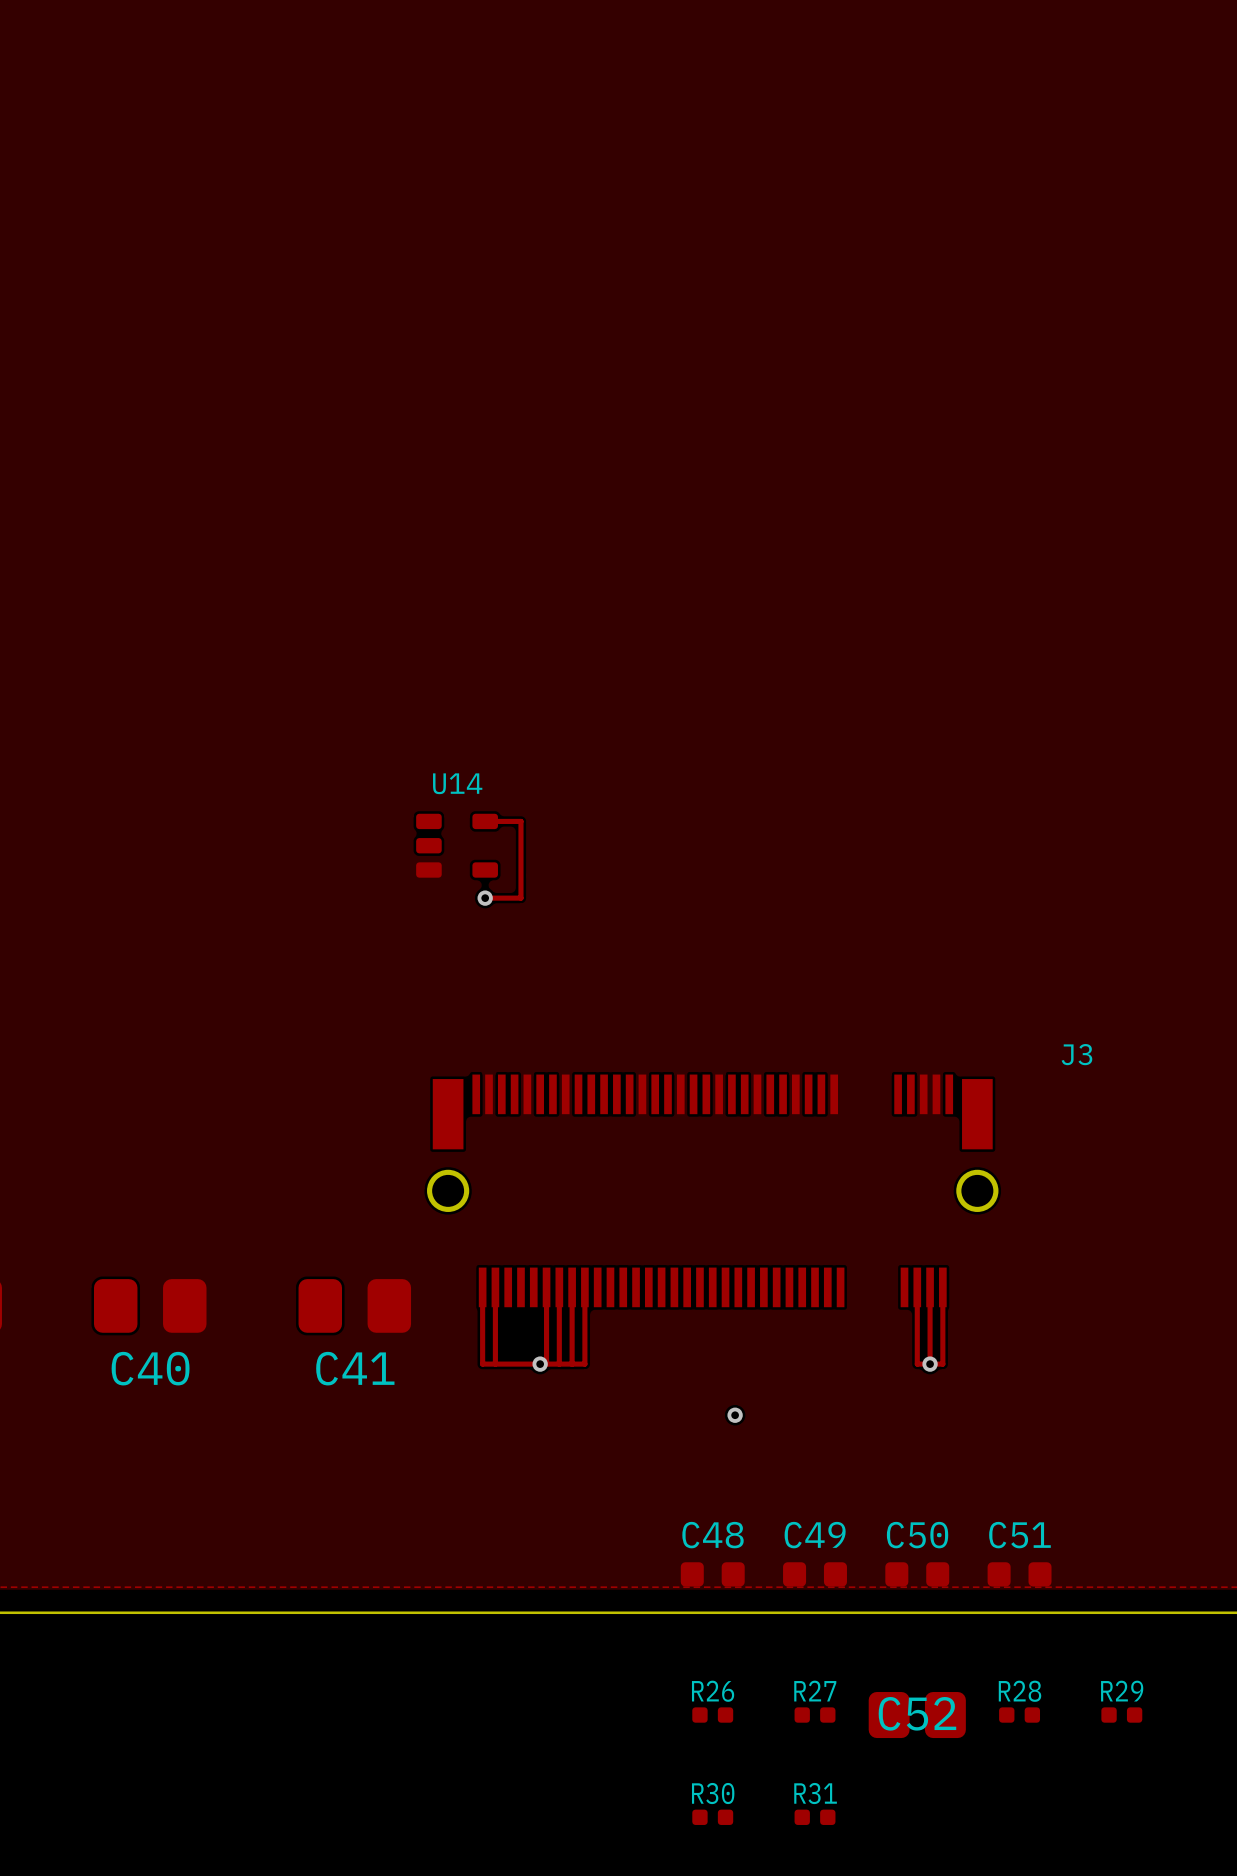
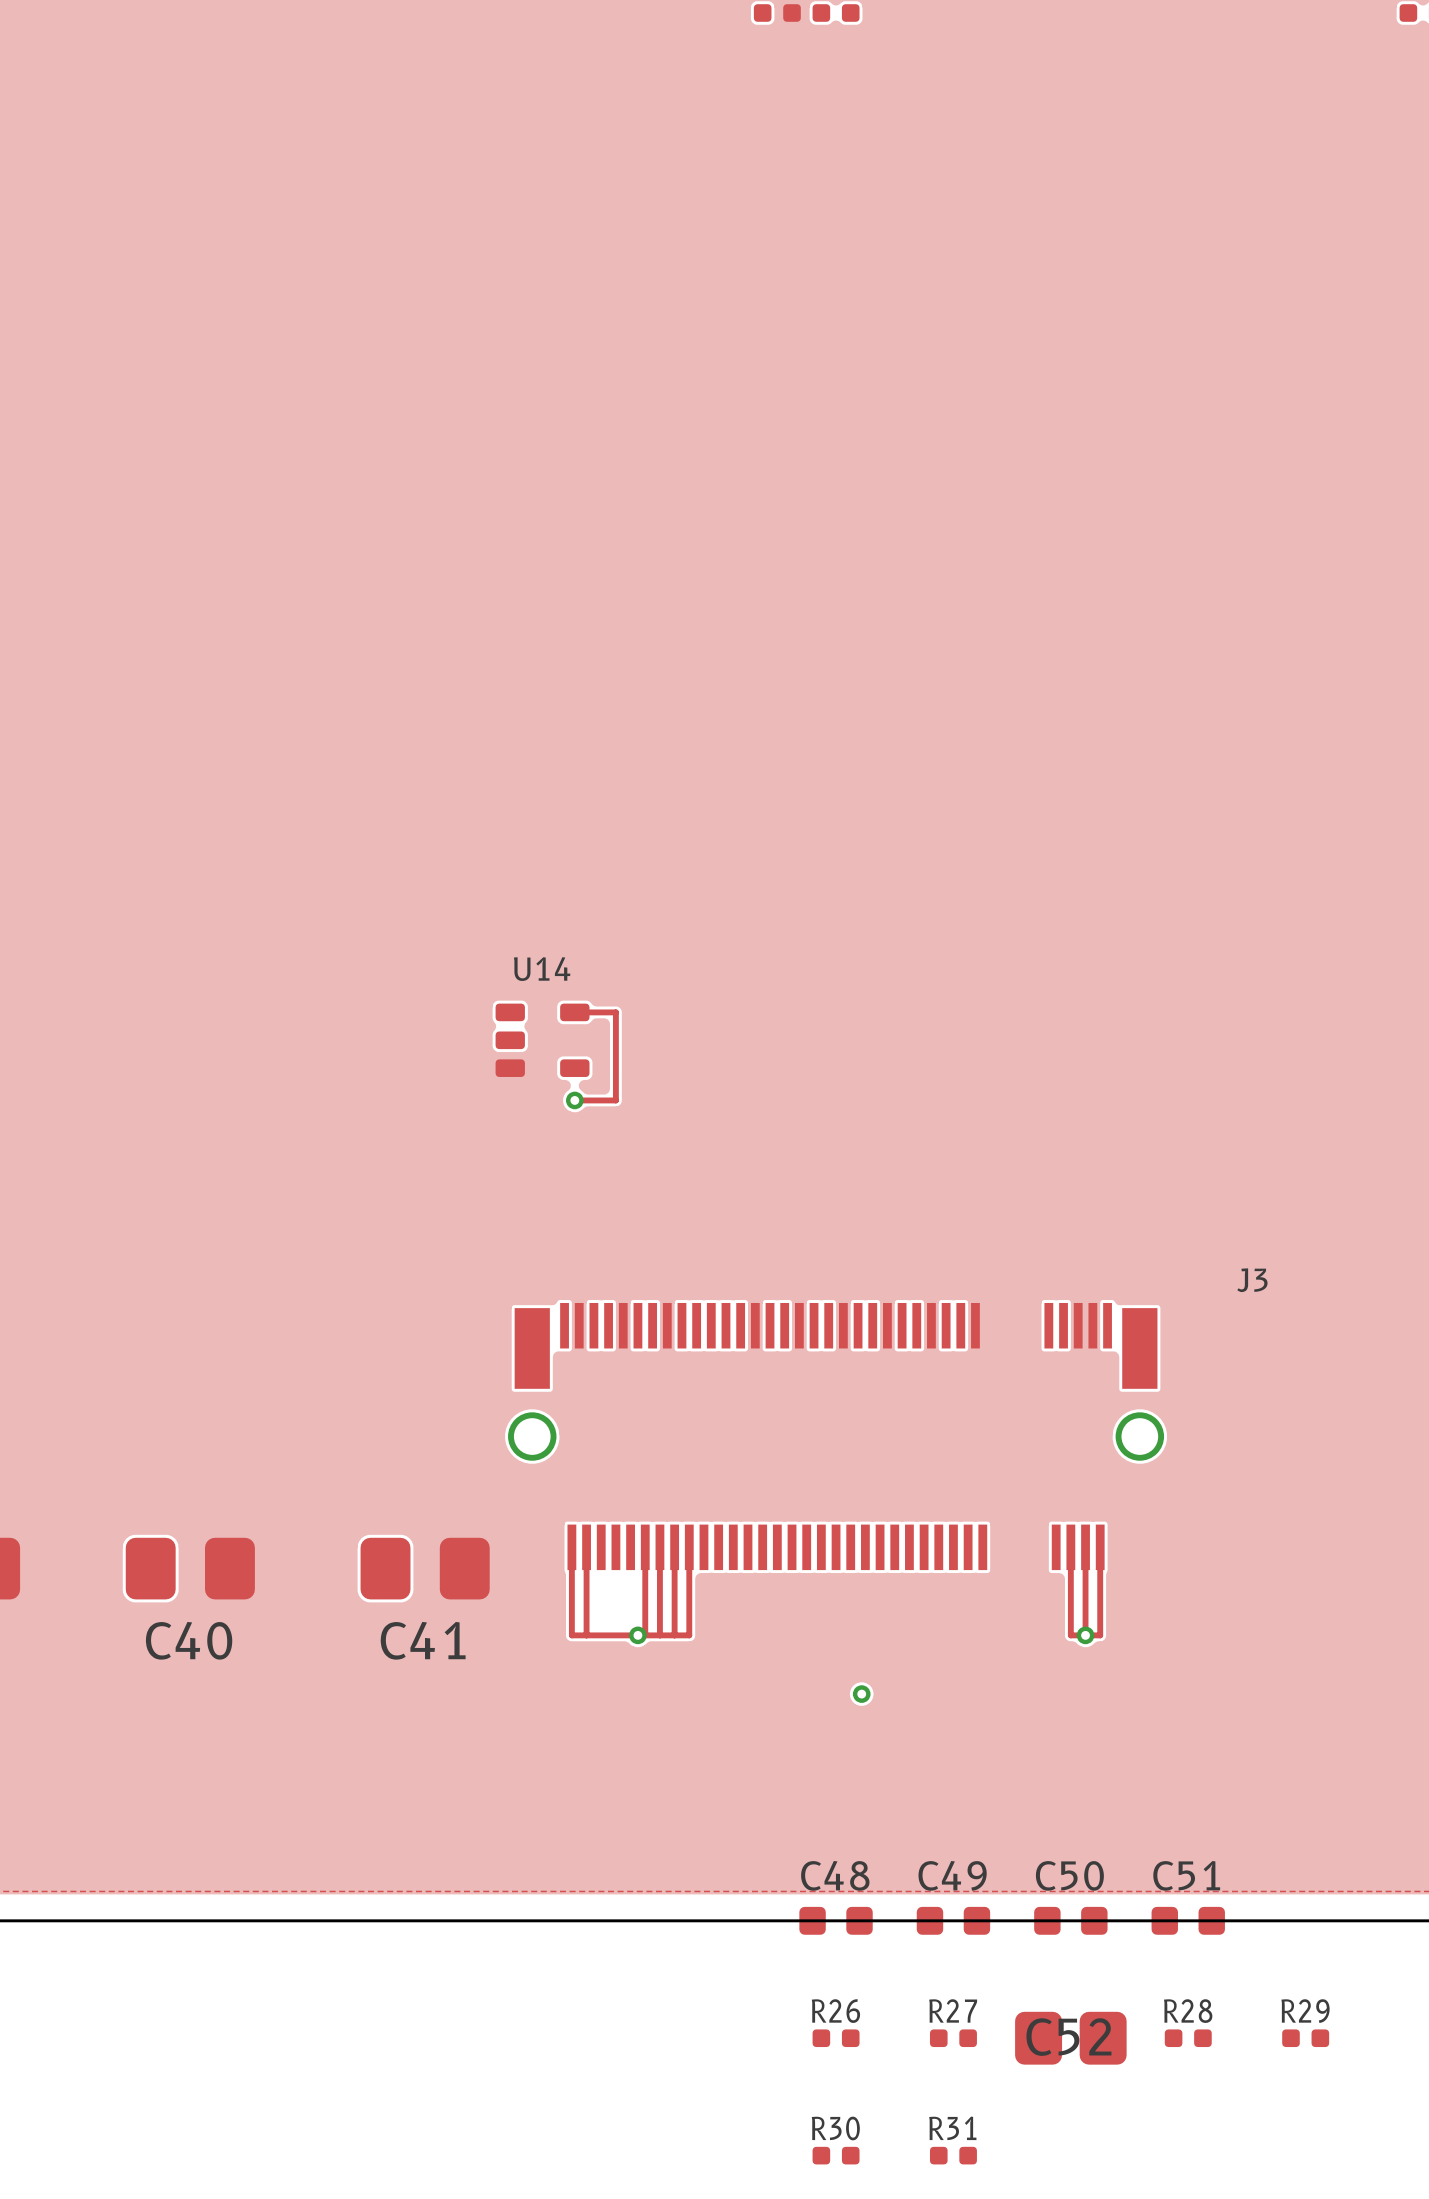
C48 position: (712, 1574) -> (836, 1920)
C49 position: (815, 1574) -> (953, 1920)
C50 position: (917, 1574) -> (1070, 1920)
C51 position: (1019, 1574) -> (1188, 1920)

